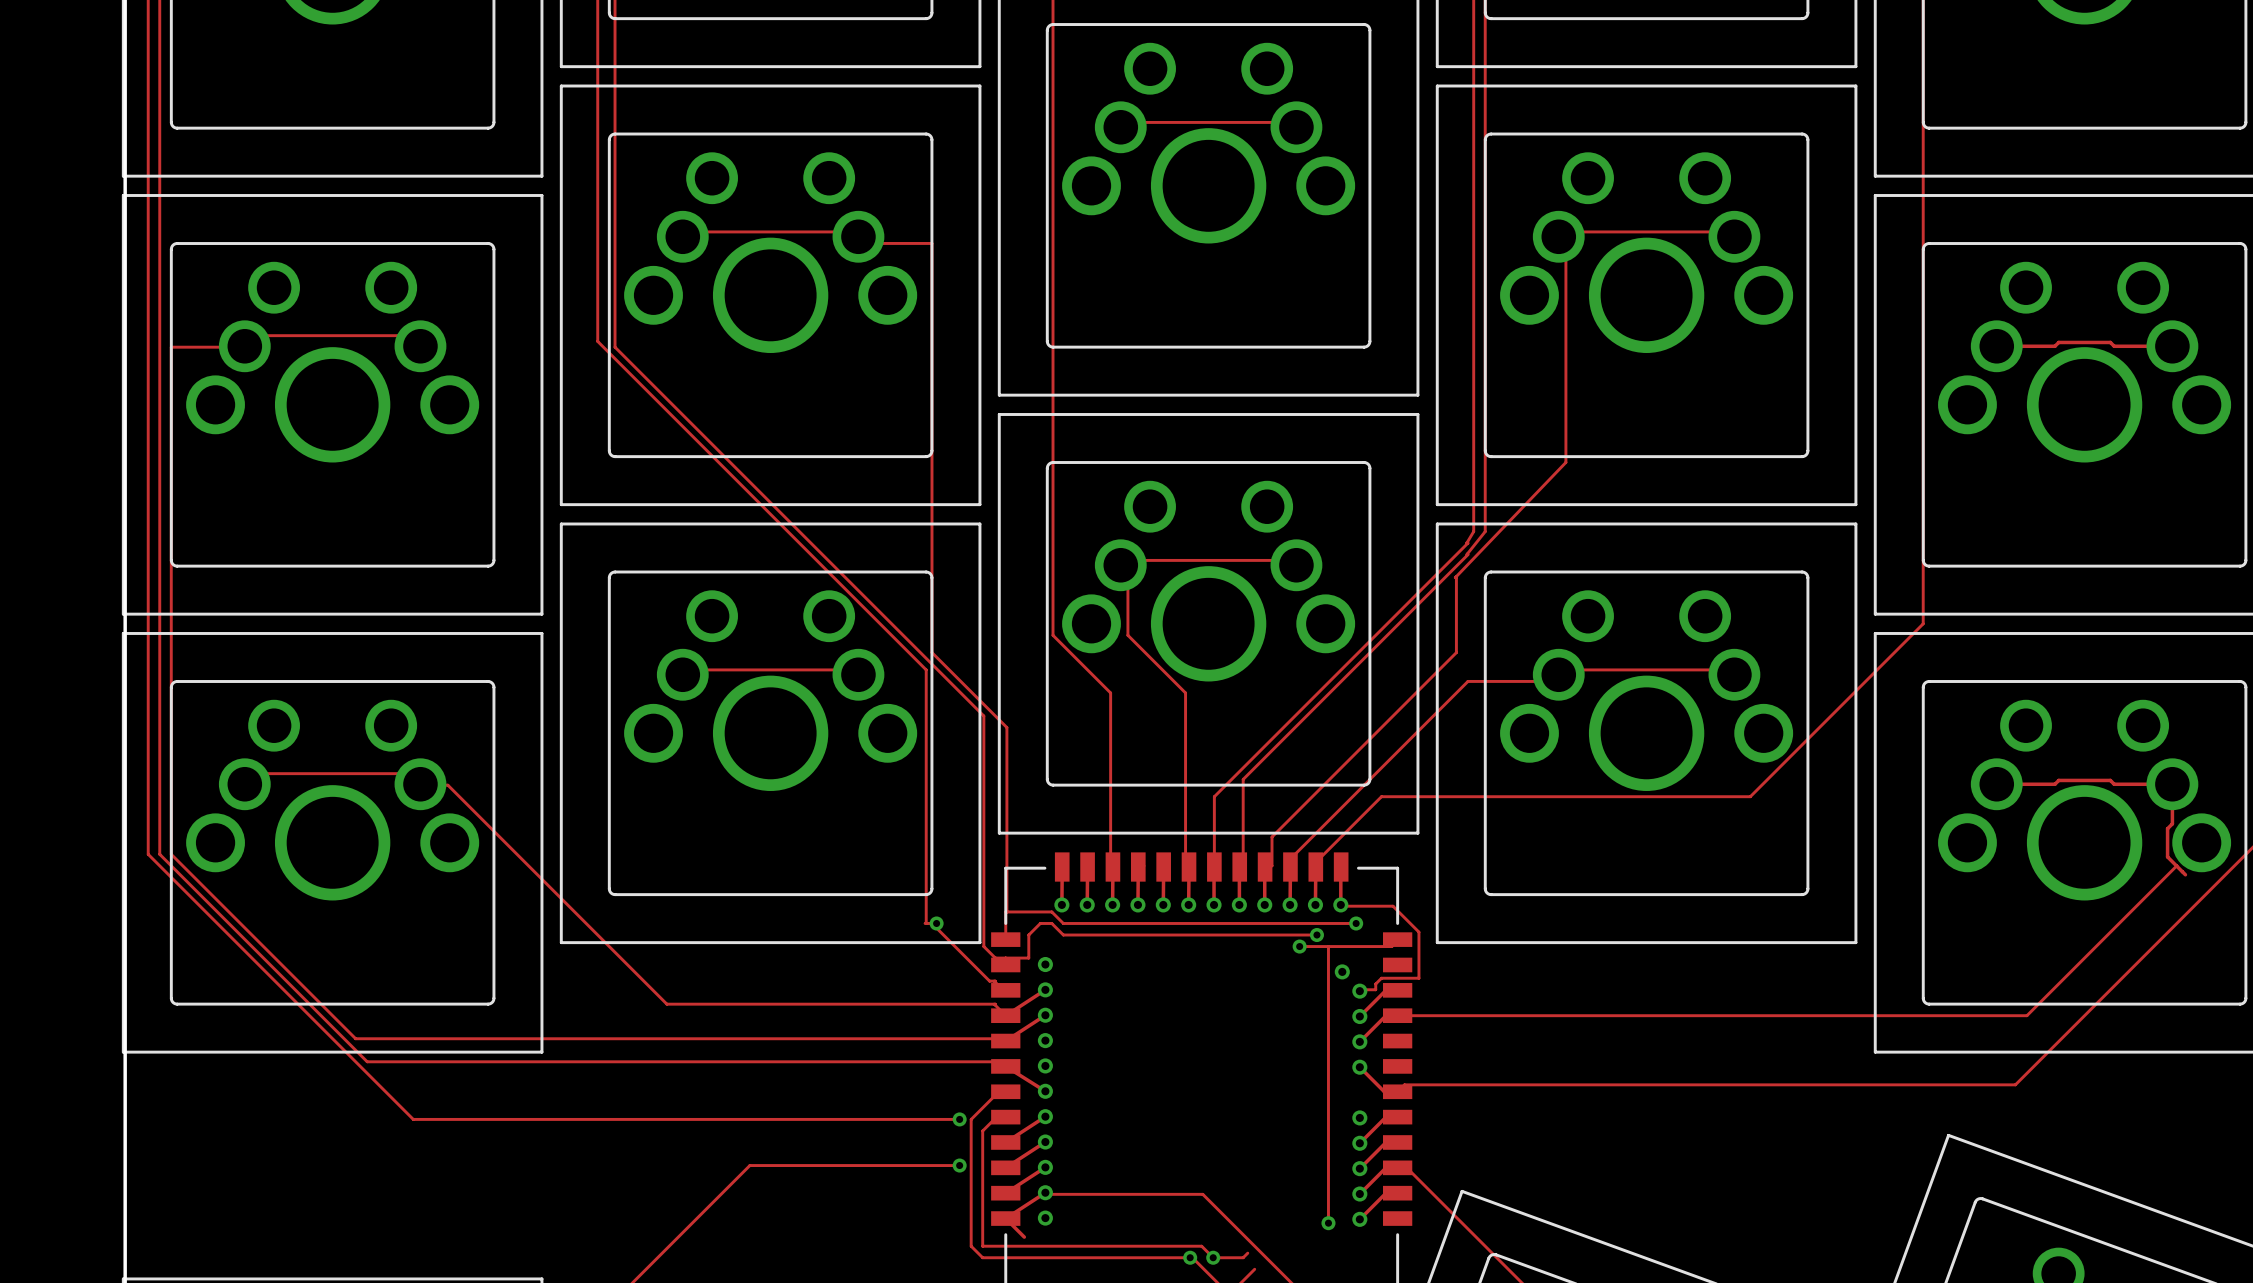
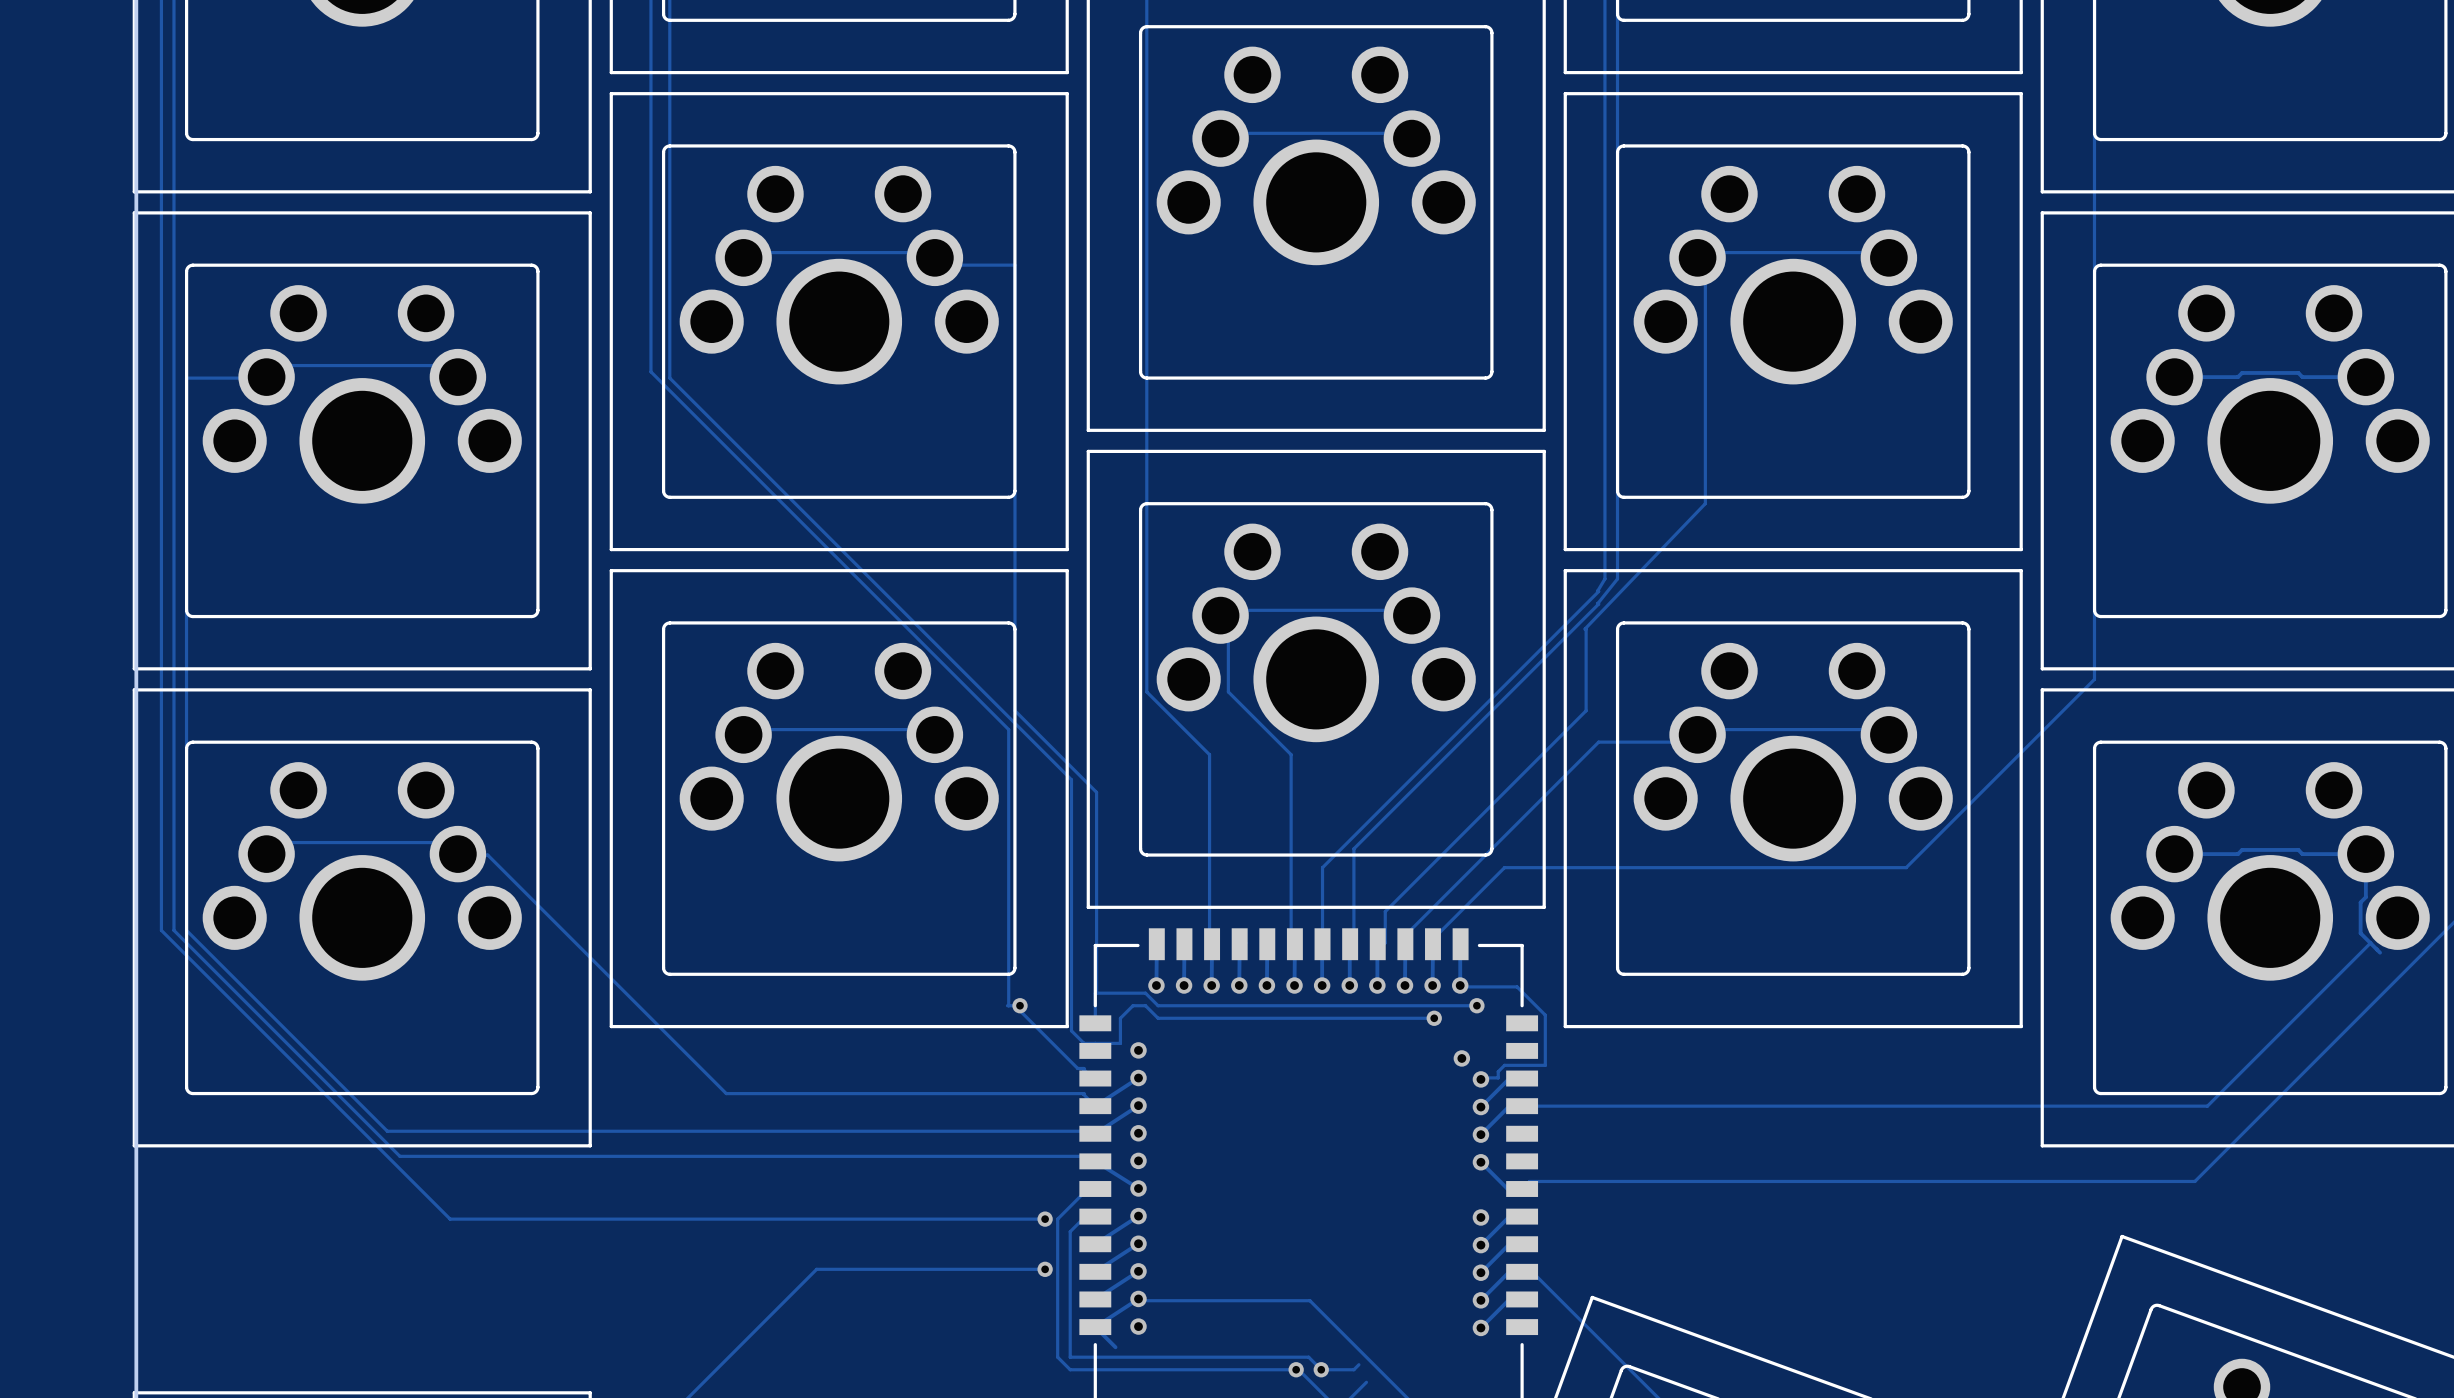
track: (1397, 939) (1391, 946) (1299, 946) -> none
via: (1299, 946) -> none
track: (1328, 946) (1328, 1223) -> none
via: (1328, 1223) -> none

